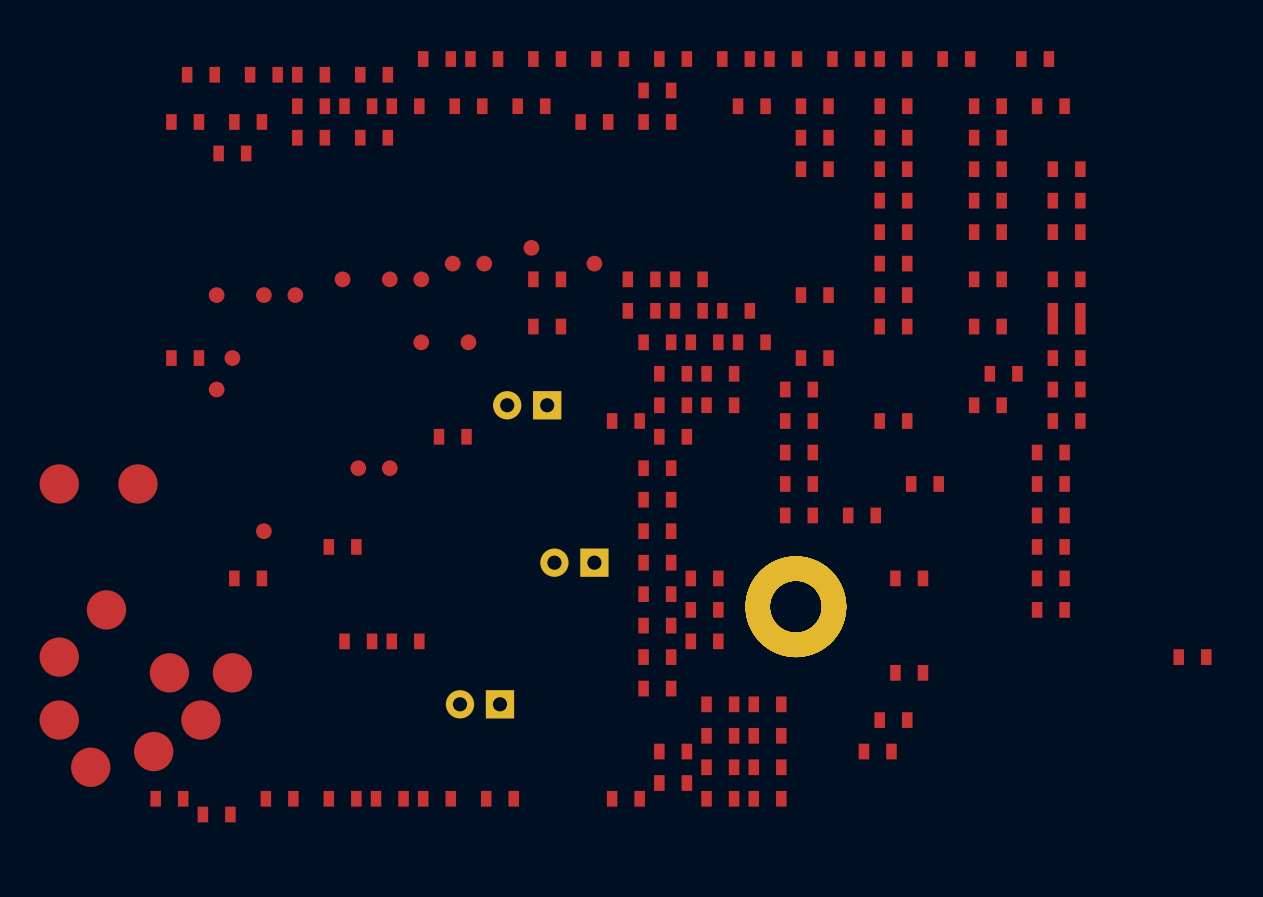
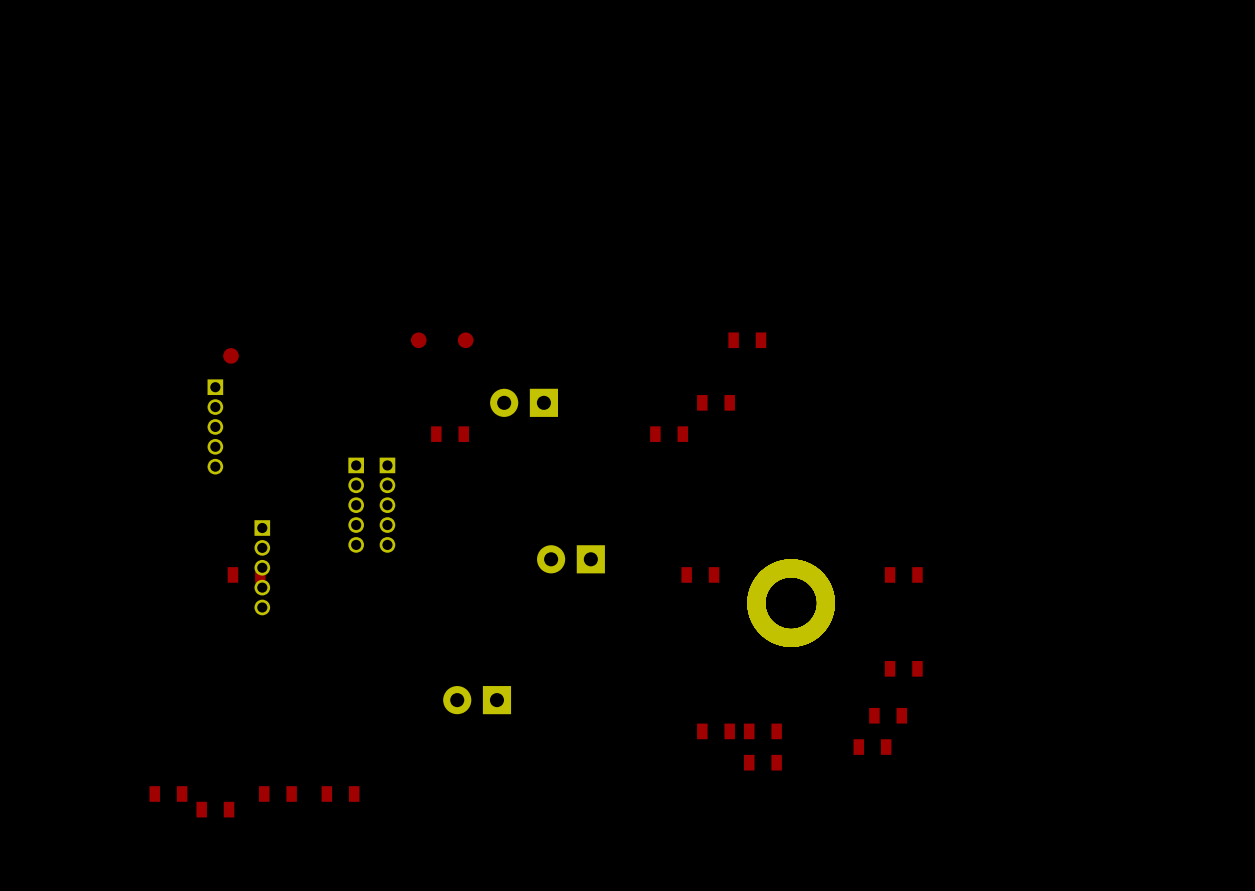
part: (437, 59) -> none
part: (484, 59) -> none
part: (547, 59) -> none
part: (610, 59) -> none
part: (673, 59) -> none
part: (736, 59) -> none
part: (783, 59) -> none
part: (846, 59) -> none
part: (893, 59) -> none
part: (956, 59) -> none
part: (1035, 59) -> none
part: (200, 74) -> none
part: (263, 74) -> none
part: (311, 74) -> none
part: (374, 74) -> none
part: (657, 90) -> none
part: (311, 106) -> none
part: (358, 106) -> none
part: (405, 106) -> none
part: (468, 106) -> none
part: (531, 106) -> none
part: (751, 106) -> none
part: (814, 106) -> none
part: (893, 106) -> none
part: (987, 106) -> none
part: (1050, 106) -> none
part: (185, 121) -> none
part: (248, 121) -> none
part: (594, 121) -> none
part: (657, 121) -> none
part: (311, 137) -> none
part: (374, 137) -> none
part: (814, 137) -> none
part: (893, 137) -> none
part: (987, 137) -> none
part: (232, 153) -> none
part: (814, 169) -> none
part: (893, 169) -> none
part: (987, 169) -> none
part: (1066, 169) -> none
part: (893, 200) -> none
part: (987, 200) -> none
part: (1066, 200) -> none
part: (893, 232) -> none
part: (987, 232) -> none
part: (1066, 232) -> none
part: (531, 247) -> none
part: (452, 263) -> none
part: (484, 263) -> none
part: (594, 263) -> none
part: (893, 263) -> none
part: (342, 279) -> none
part: (389, 279) -> none
part: (421, 279) -> none
part: (547, 279) -> none
part: (641, 279) -> none
part: (688, 279) -> none
part: (987, 279) -> none
part: (1066, 279) -> none
part: (216, 295) -> none
part: (263, 295) -> none
part: (295, 295) -> none
part: (814, 295) -> none
part: (893, 295) -> none
part: (641, 310) -> none
part: (688, 310) -> none
part: (736, 310) -> none
part: (1066, 310) -> none
part: (547, 326) -> none
part: (893, 326) -> none
part: (987, 326) -> none
part: (1066, 326) -> none
part: (657, 342) -> none
part: (704, 342) -> none
part: (185, 358) -> none
part: (814, 358) -> none
part: (1066, 358) -> none
part: (673, 373) -> none
part: (720, 373) -> none
part: (1003, 373) -> none
part: (216, 389) -> none
part: (799, 389) -> none
part: (1066, 389) -> none
part: (673, 405) -> none
part: (987, 405) -> none
part: (625, 421) -> none
part: (799, 421) -> none
part: (893, 421) -> none
part: (1066, 421) -> none
part: none -> (215, 426)
part: (799, 452) -> none
part: (1050, 452) -> none
part: (358, 468) -> none
part: (389, 468) -> none
part: (657, 468) -> none
part: (59, 483) -> none
part: (137, 483) -> none
part: (799, 483) -> none
part: (924, 483) -> none
part: (1050, 483) -> none
part: (657, 499) -> none
part: none -> (356, 505)
part: none -> (387, 505)
part: (799, 515) -> none
part: (861, 515) -> none
part: (1050, 515) -> none
part: (263, 531) -> none
part: (657, 531) -> none
part: (342, 546) -> none
part: (1050, 546) -> none
part footprint: [745, 556, 847, 658] -> [747, 559, 835, 647]
part: (657, 562) -> none
part: none -> (262, 567)
part: (1050, 578) -> none
part: (657, 594) -> none
part: (106, 609) -> none
part: (704, 609) -> none
part: (1050, 609) -> none
part: (657, 625) -> none
part: (358, 641) -> none
part: (405, 641) -> none
part: (704, 641) -> none
part: (59, 657) -> none
part: (657, 657) -> none
part: (1192, 657) -> none
part: (169, 672) -> none
part: (232, 672) -> none
part: (657, 688) -> none
part: (720, 704) -> none
part: (767, 704) -> none
part: (59, 720) -> none
part: (200, 720) -> none
part: (153, 751) -> none
part: (673, 751) -> none
part: (90, 767) -> none
part: (720, 767) -> none
part: (673, 783) -> none
part: (389, 798) -> none
part: (437, 798) -> none
part: (499, 798) -> none
part: (625, 798) -> none
part: (720, 798) -> none
part: (767, 798) -> none

